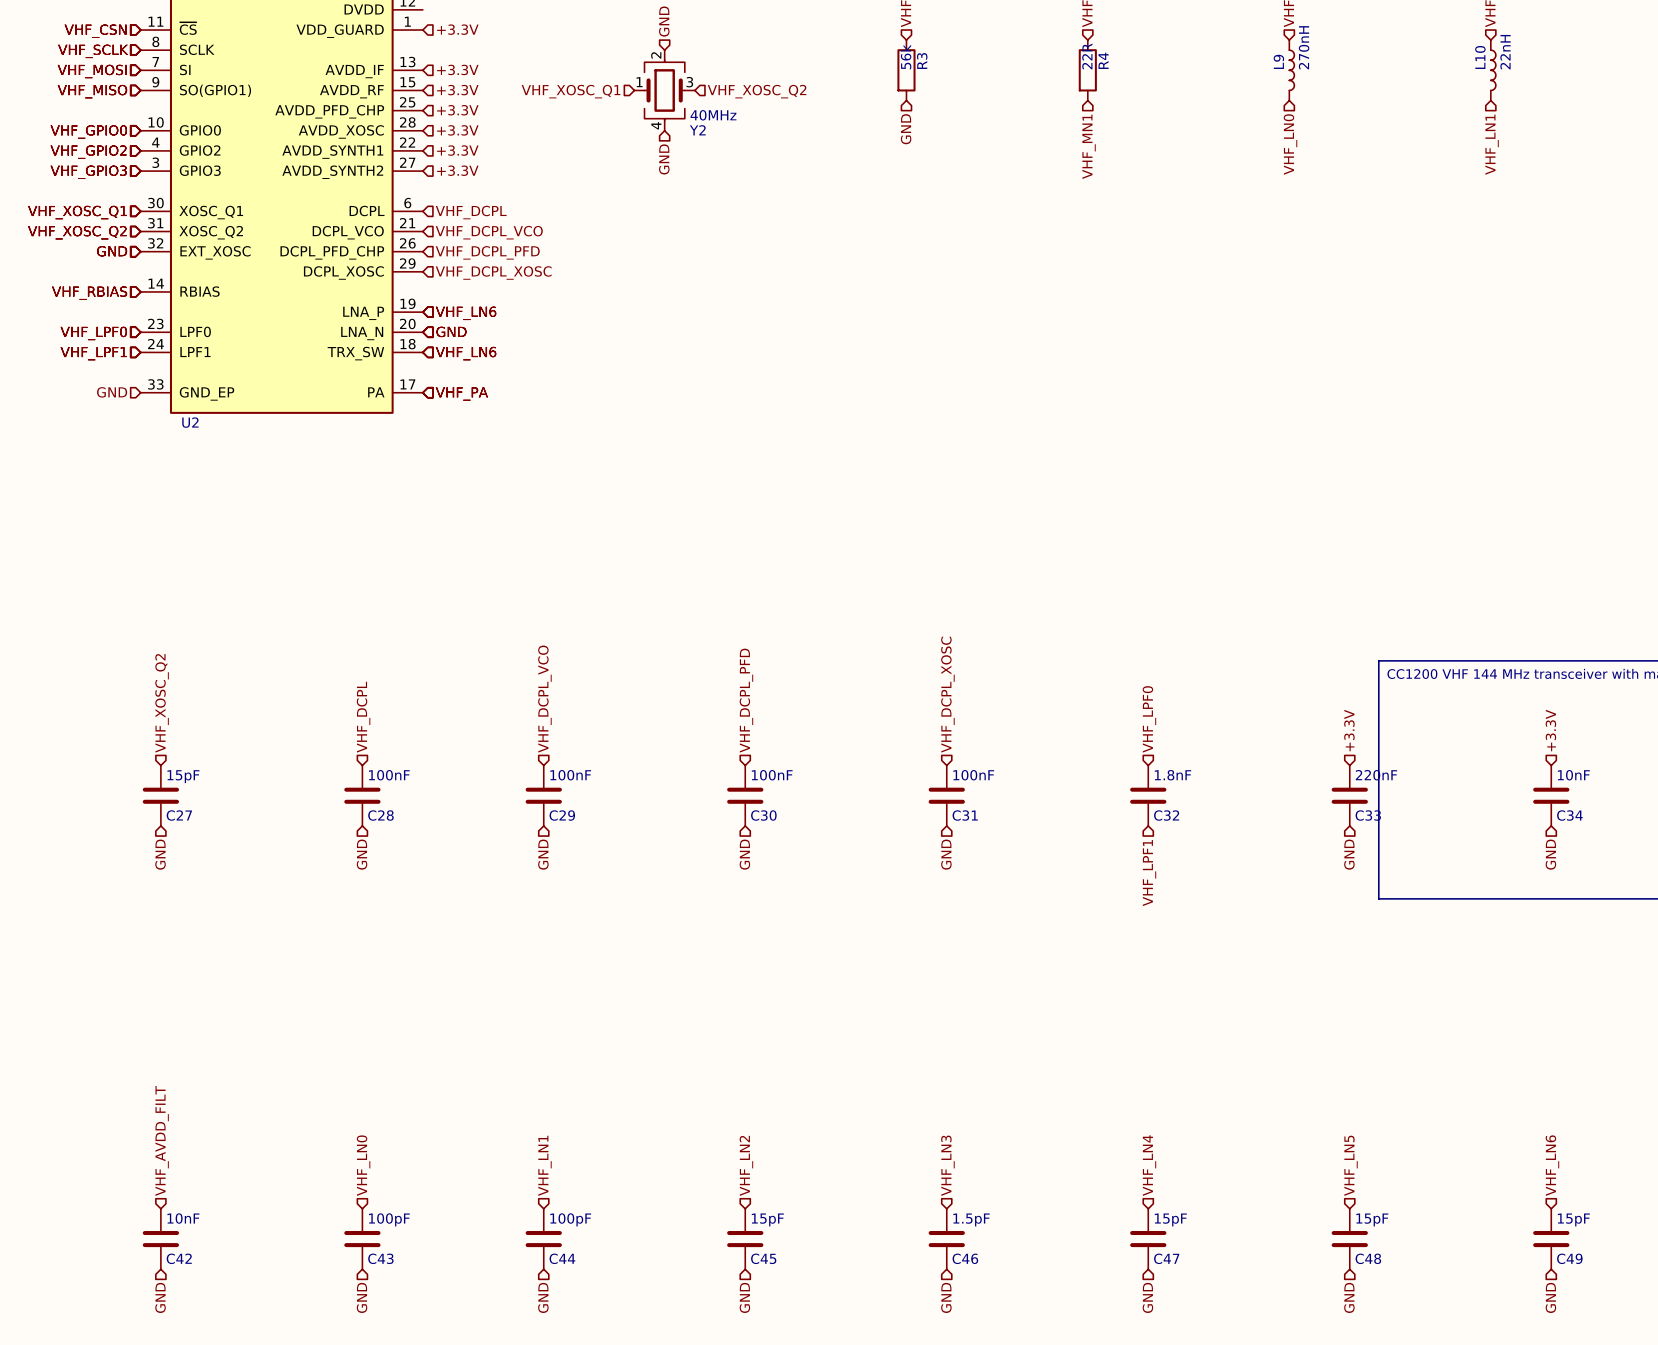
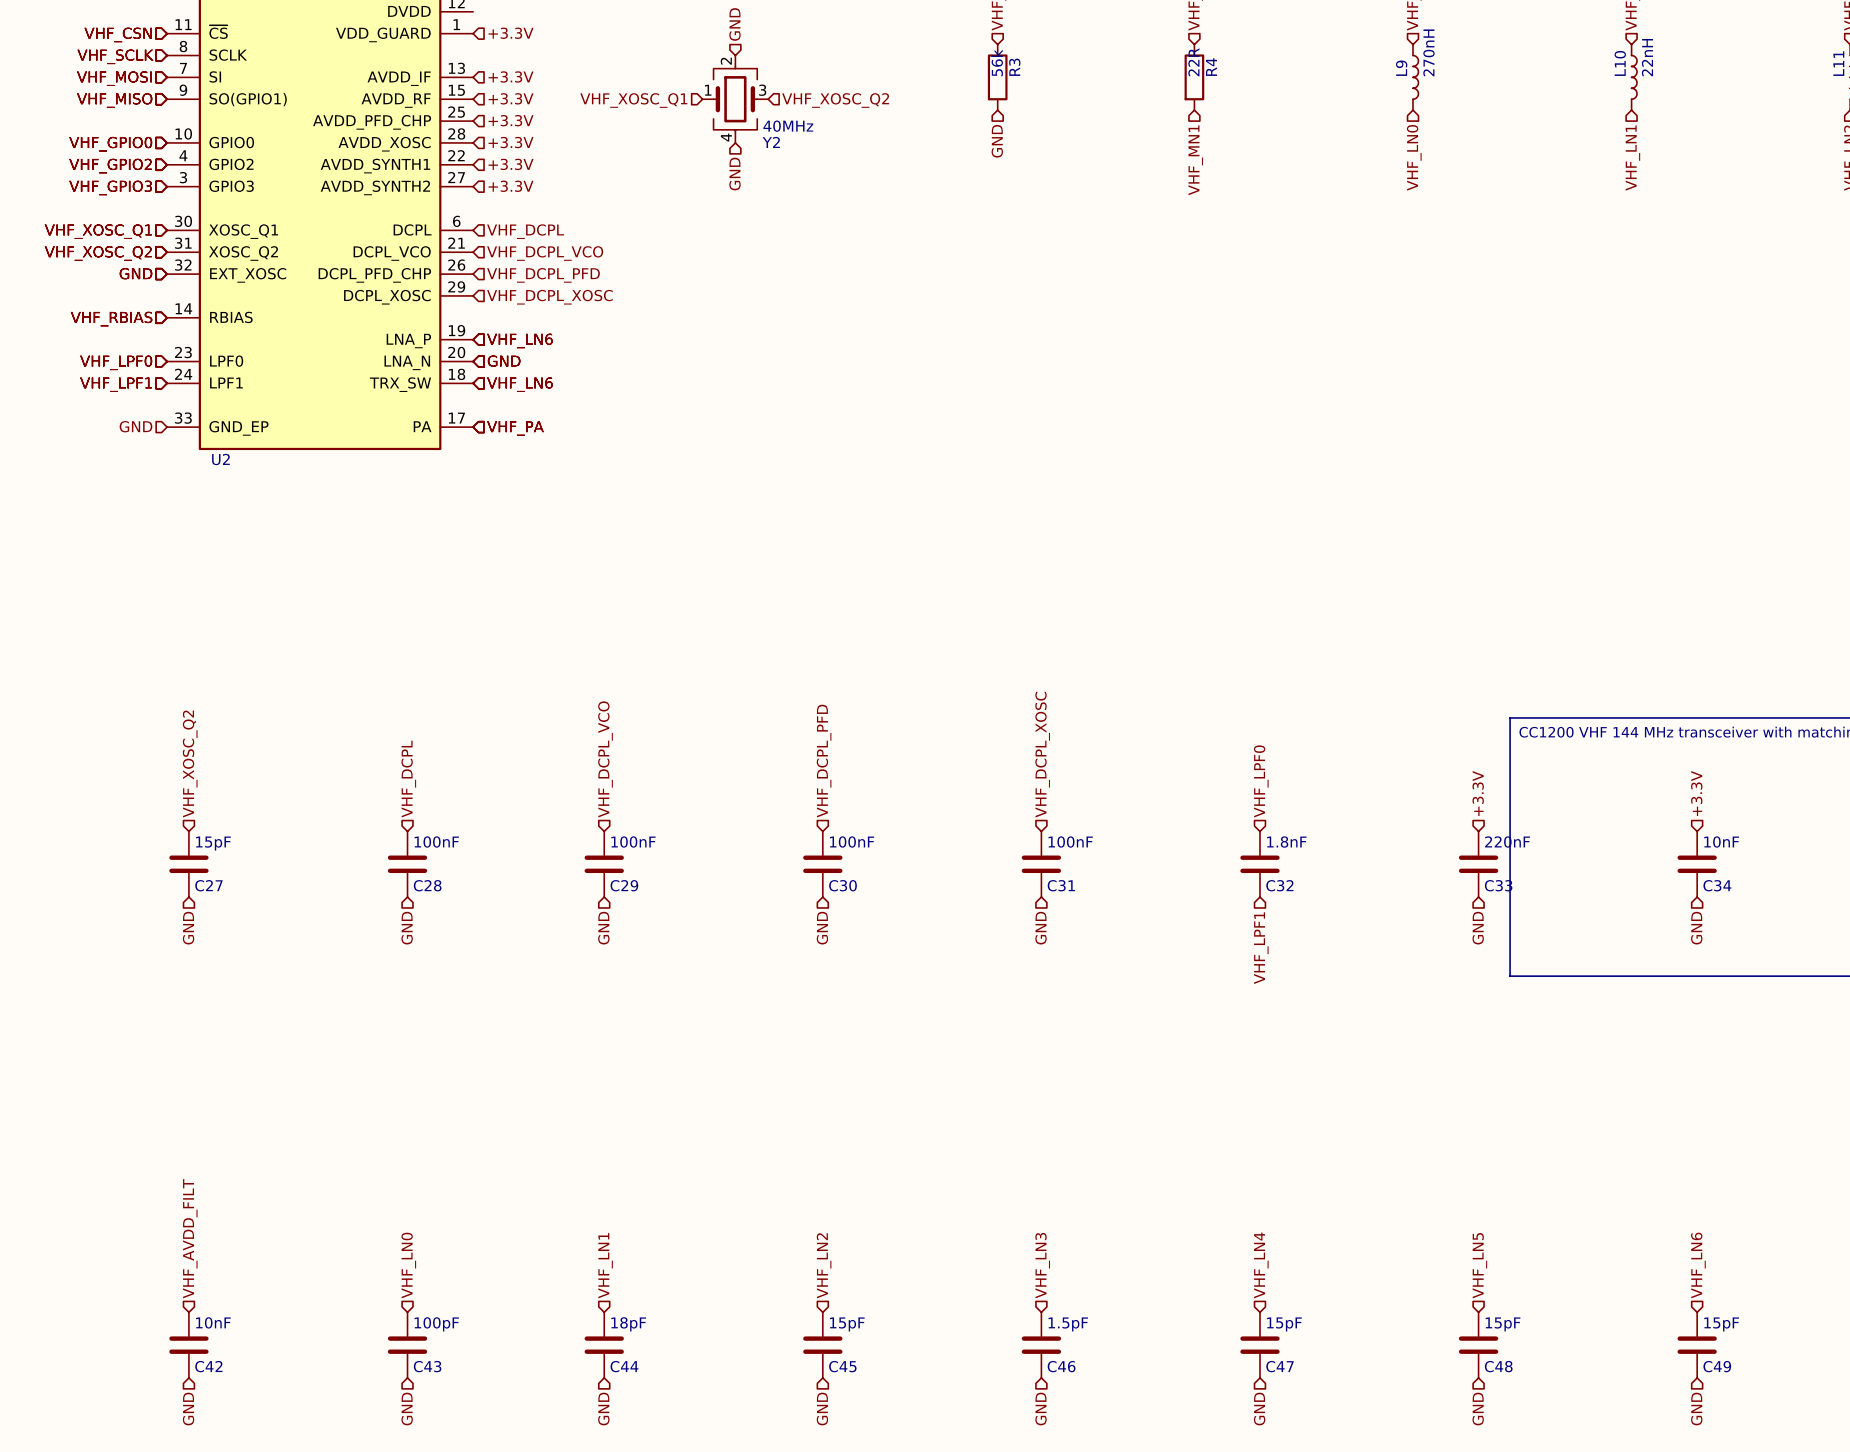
C44 value: 100pF (570, 1219) -> 18pF (628, 1324)

